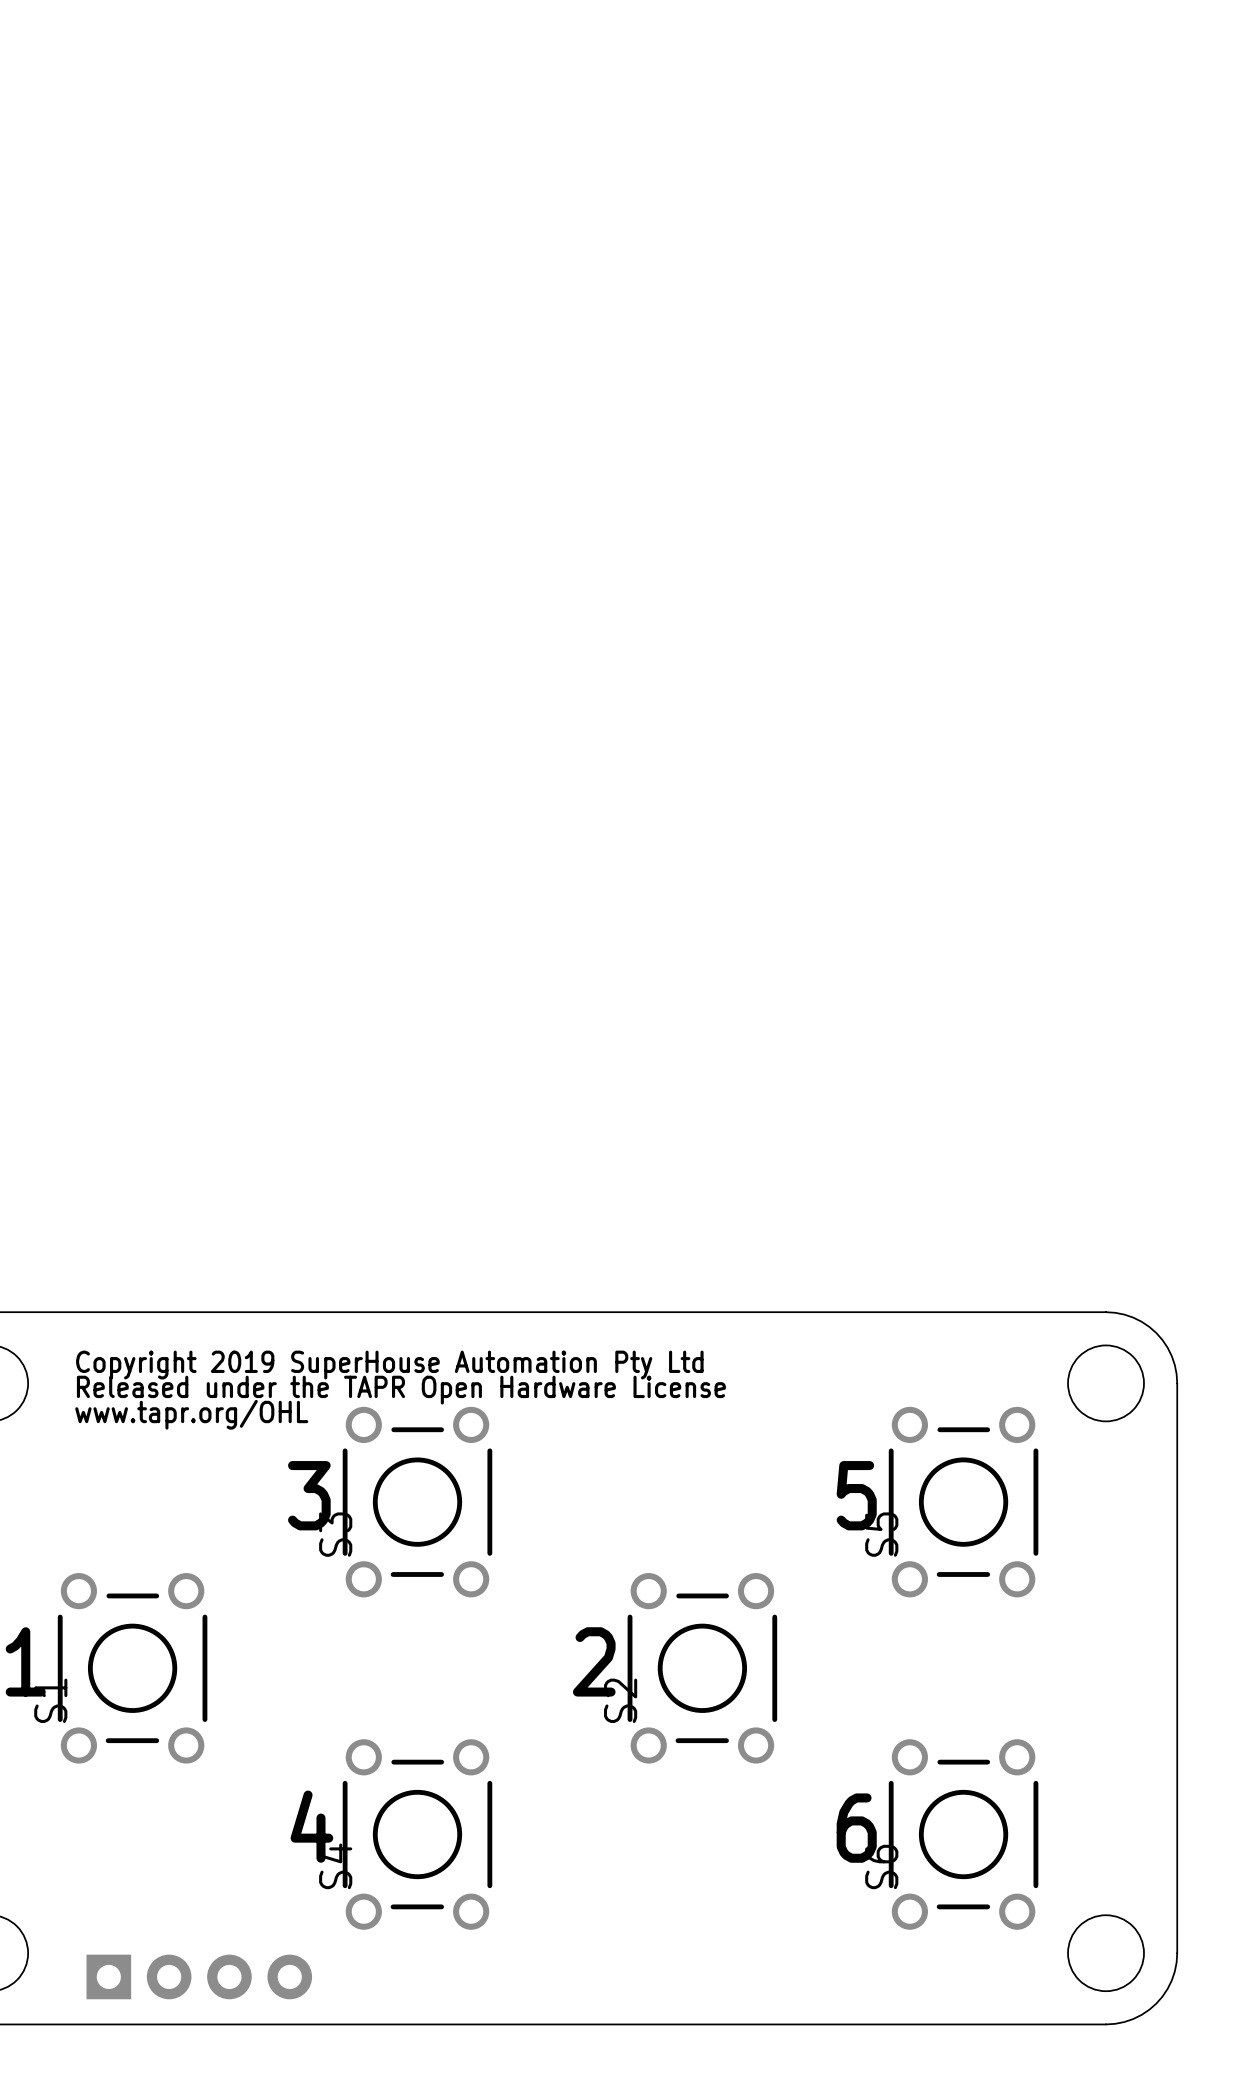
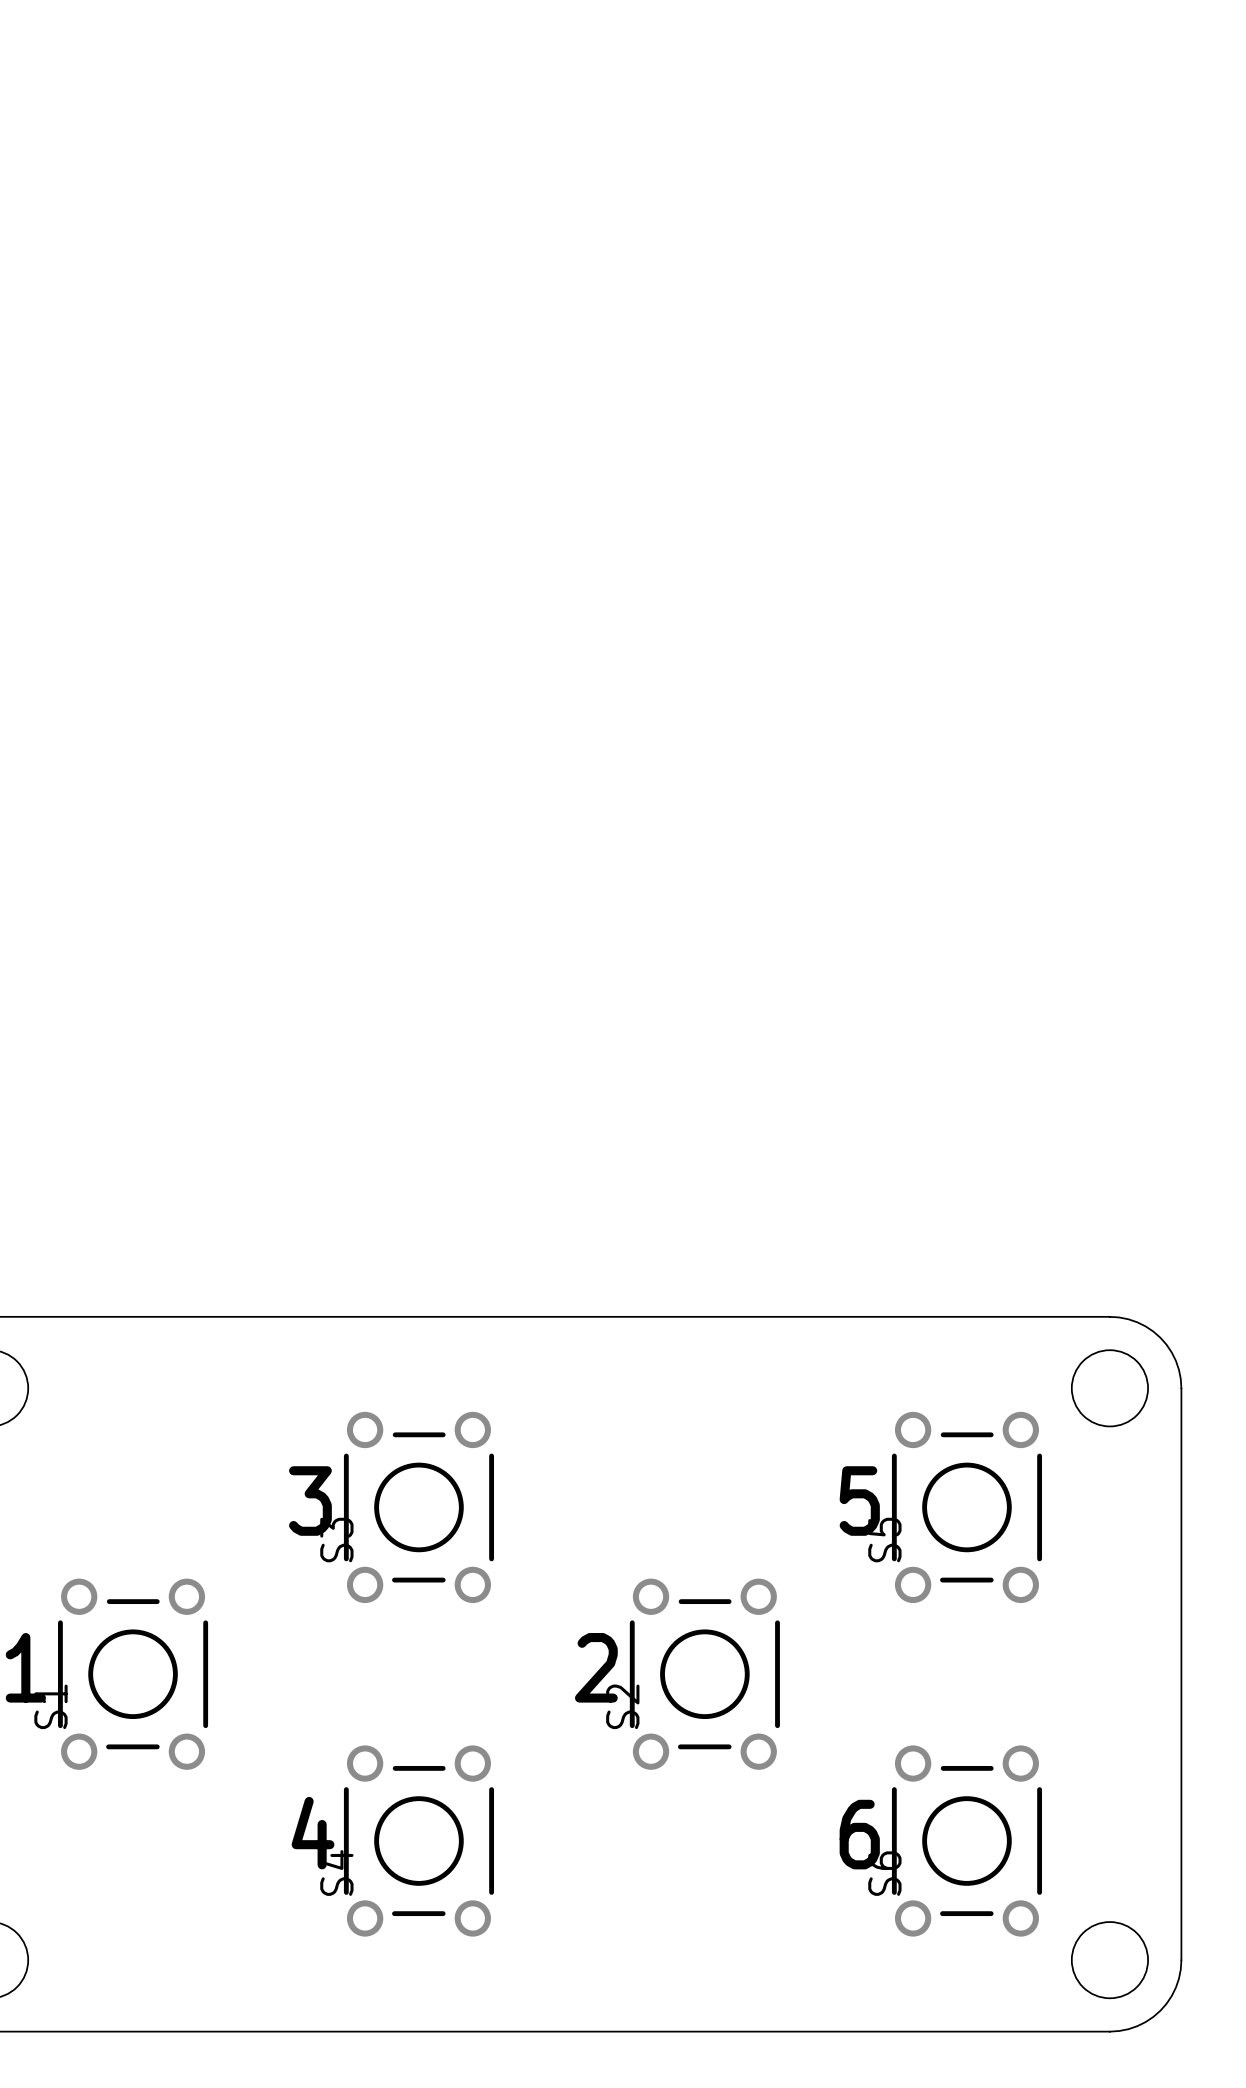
text: Copyright 2019 SuperHouse Automation Pty Ltd (389, 1365) -> none
text: Released under the TAPR Open Hardware License (401, 1390) -> none
text: www.tapr.org/OHL (191, 1414) -> none
part: (199, 1976) -> none

